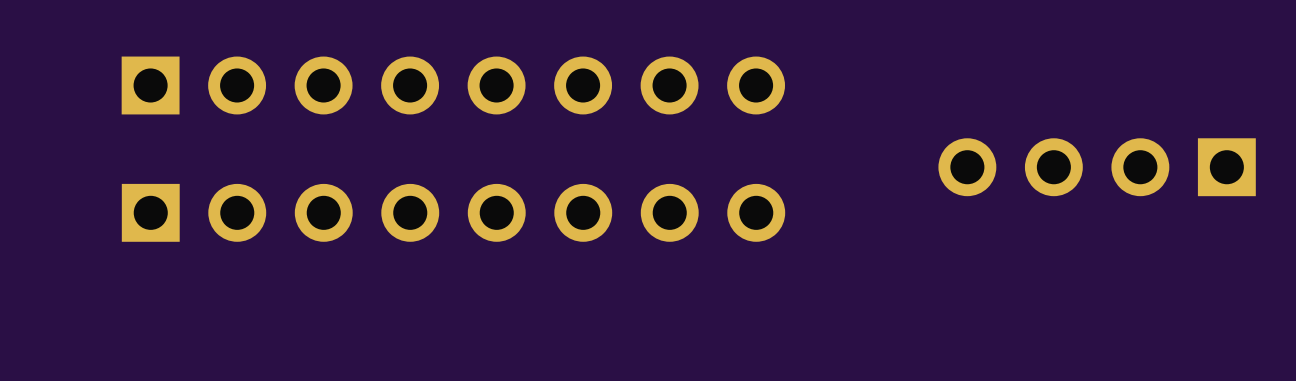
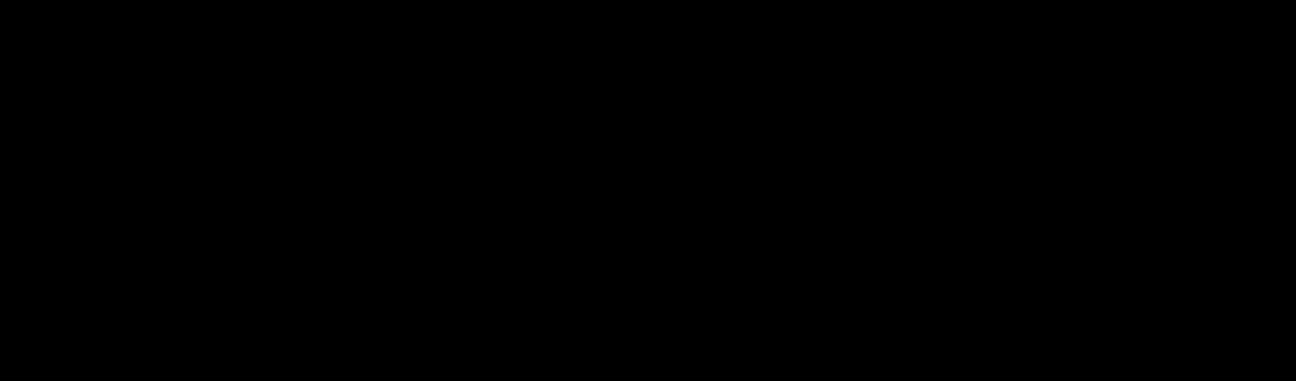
part: (453, 85) -> none
part: (1097, 167) -> none
part: (453, 212) -> none

